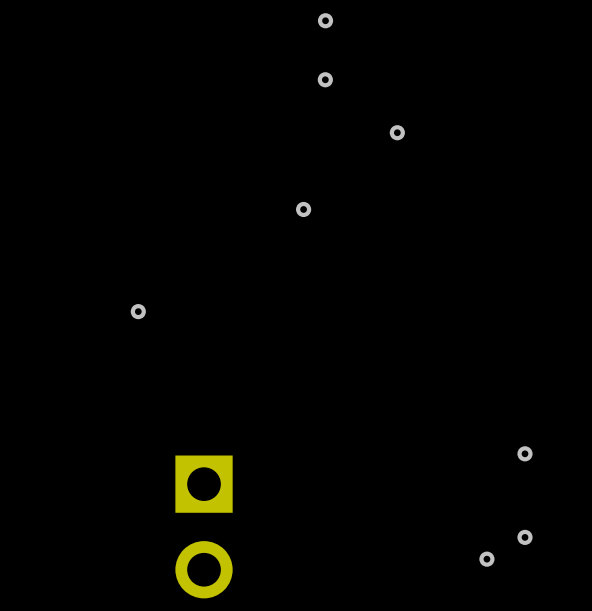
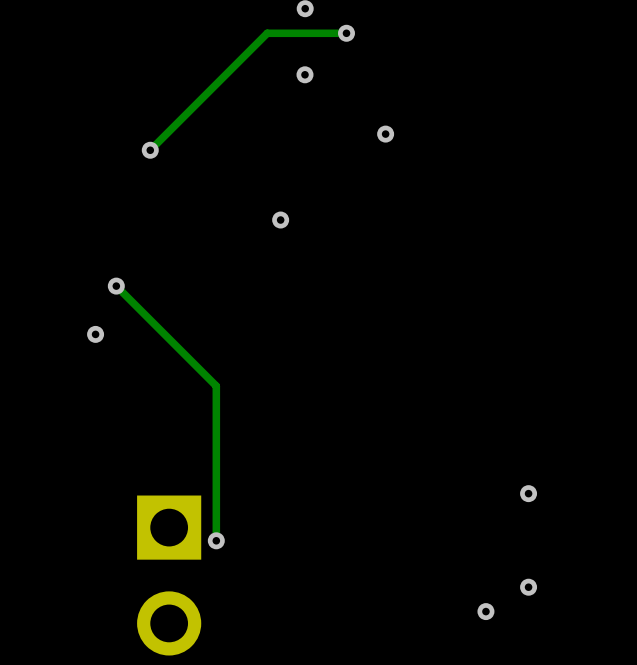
track: none -> (346, 33) (267, 33) (150, 150)
via: none -> (346, 33)
via: none -> (150, 150)
track: none -> (116, 286) (216, 386) (216, 540)
via: none -> (116, 286)
via: none -> (216, 540)

